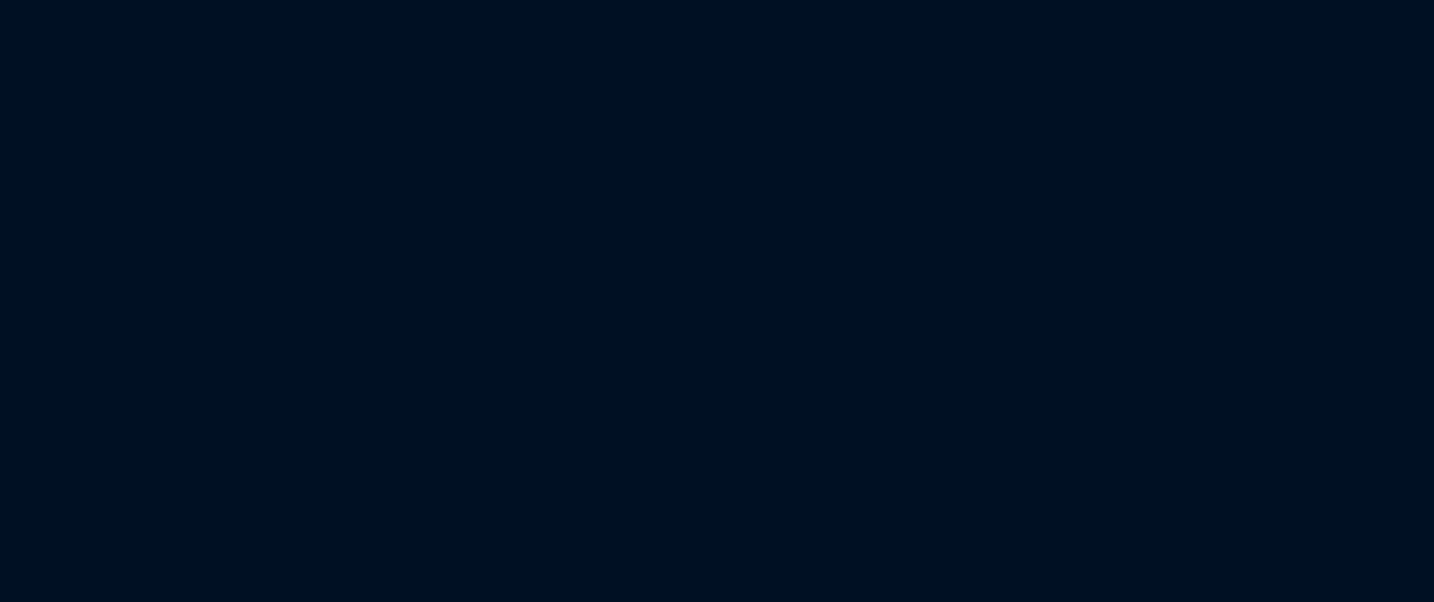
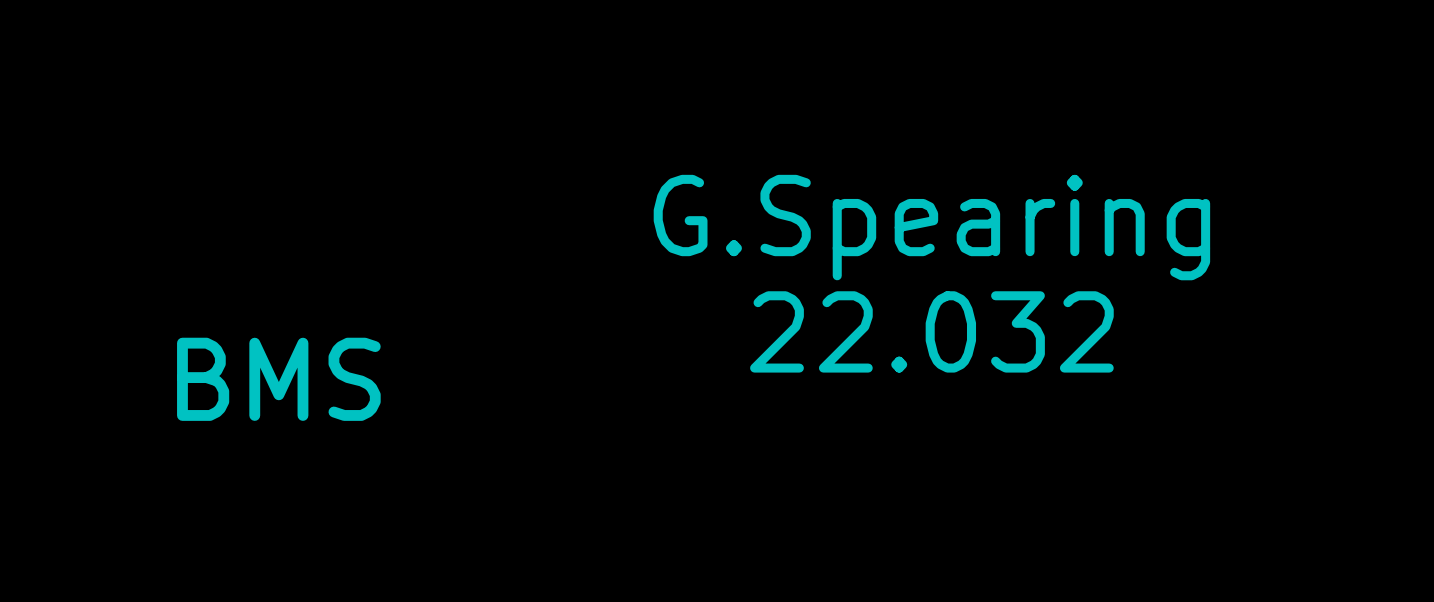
text: none -> G.Spearing (931, 227)
text: none -> 22.032 (931, 331)
text: none -> BMS (278, 379)

